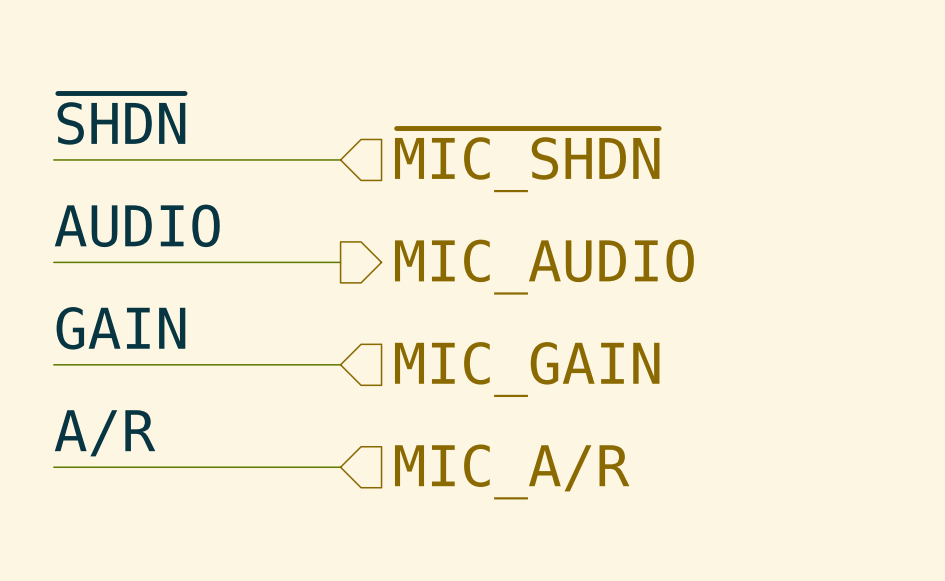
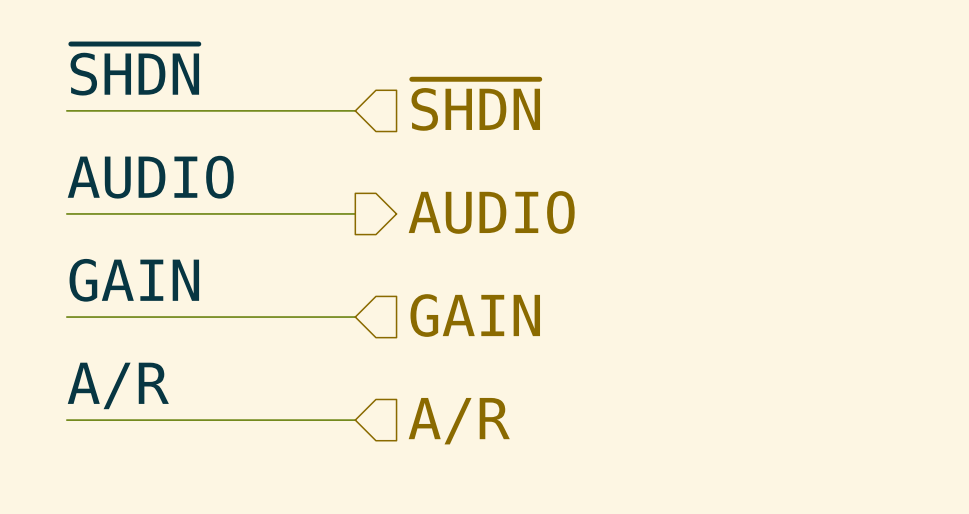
hierarchical label: ~{MIC_SHDN} (527, 160) -> ~{SHDN} (475, 105)
hierarchical label: MIC_AUDIO (544, 267) -> AUDIO (491, 212)
hierarchical label: MIC_GAIN (527, 369) -> GAIN (475, 315)
hierarchical label: MIC_A/R (512, 471) -> A/R (459, 421)

